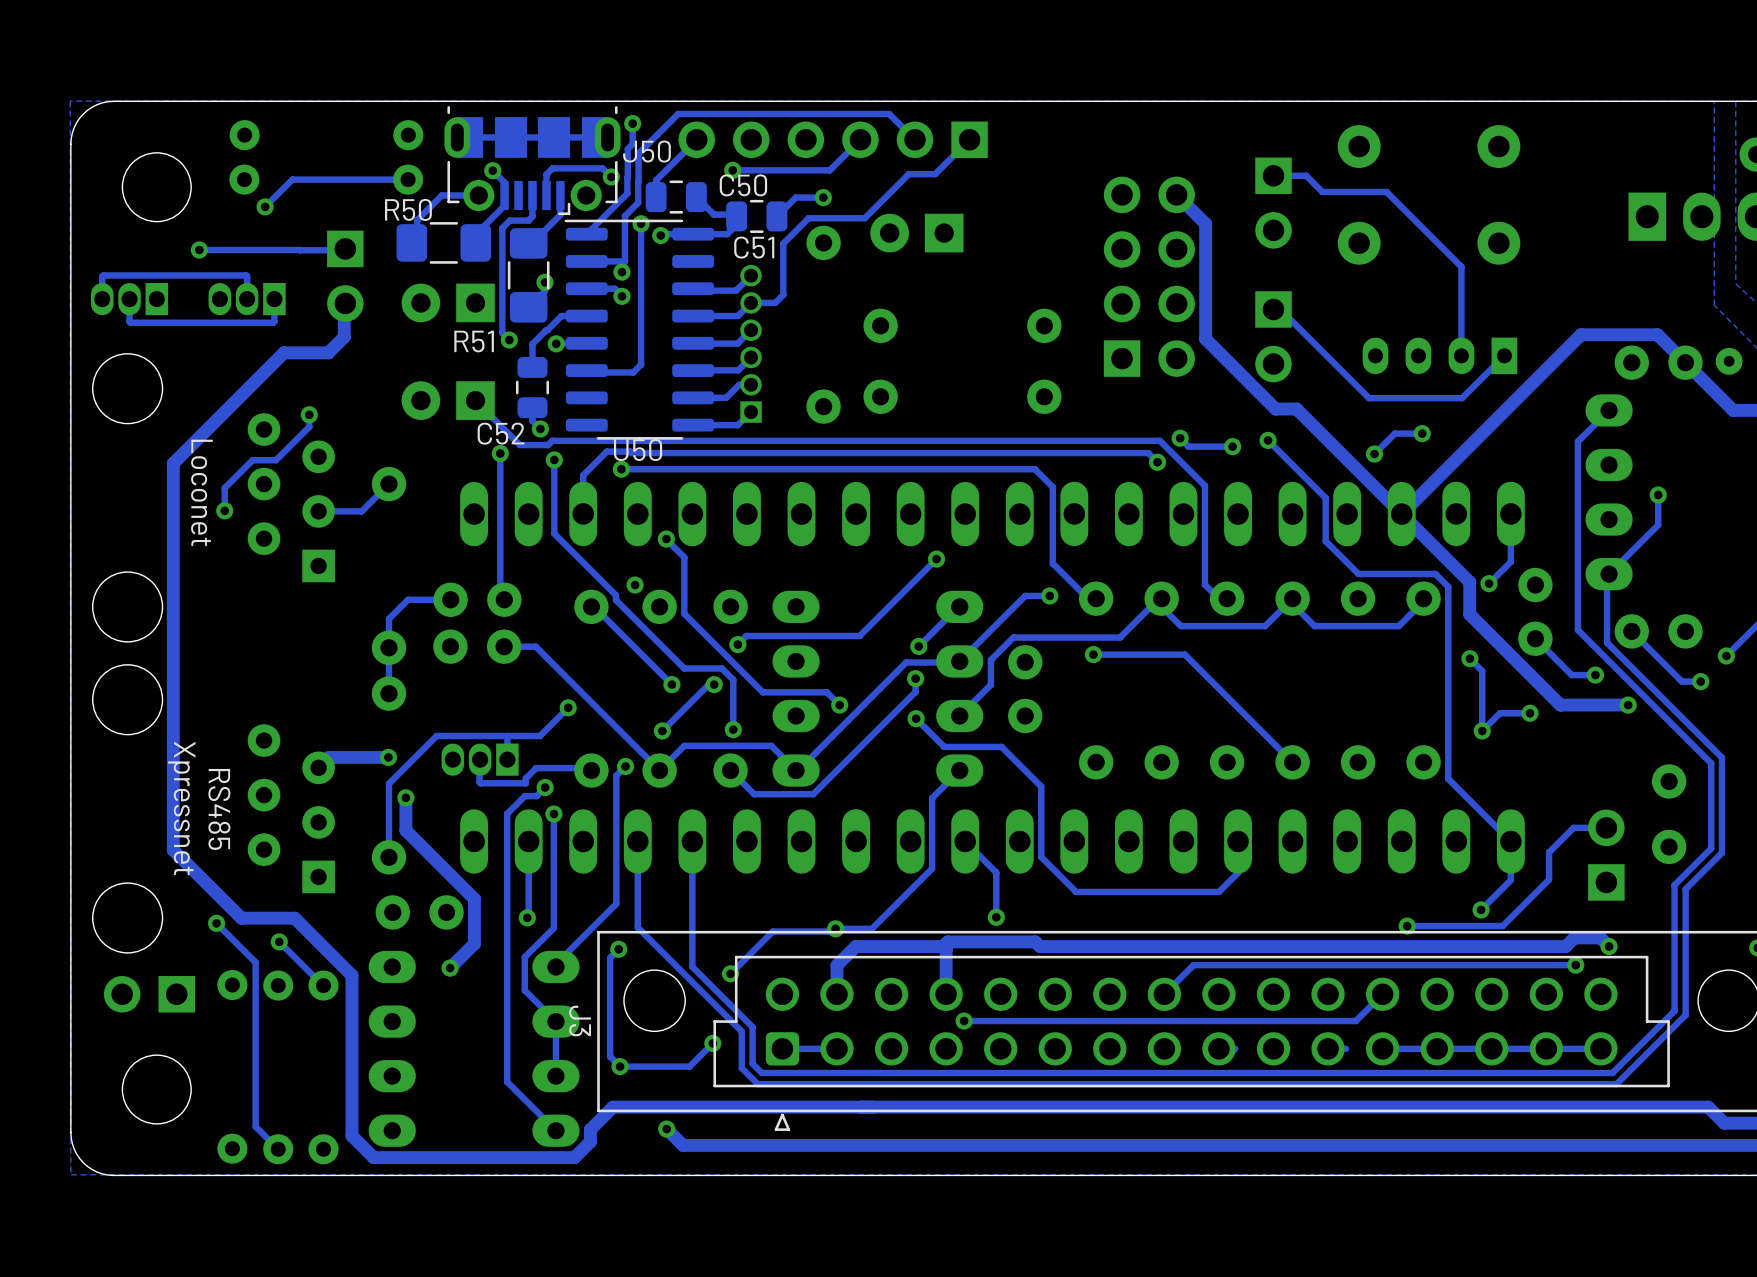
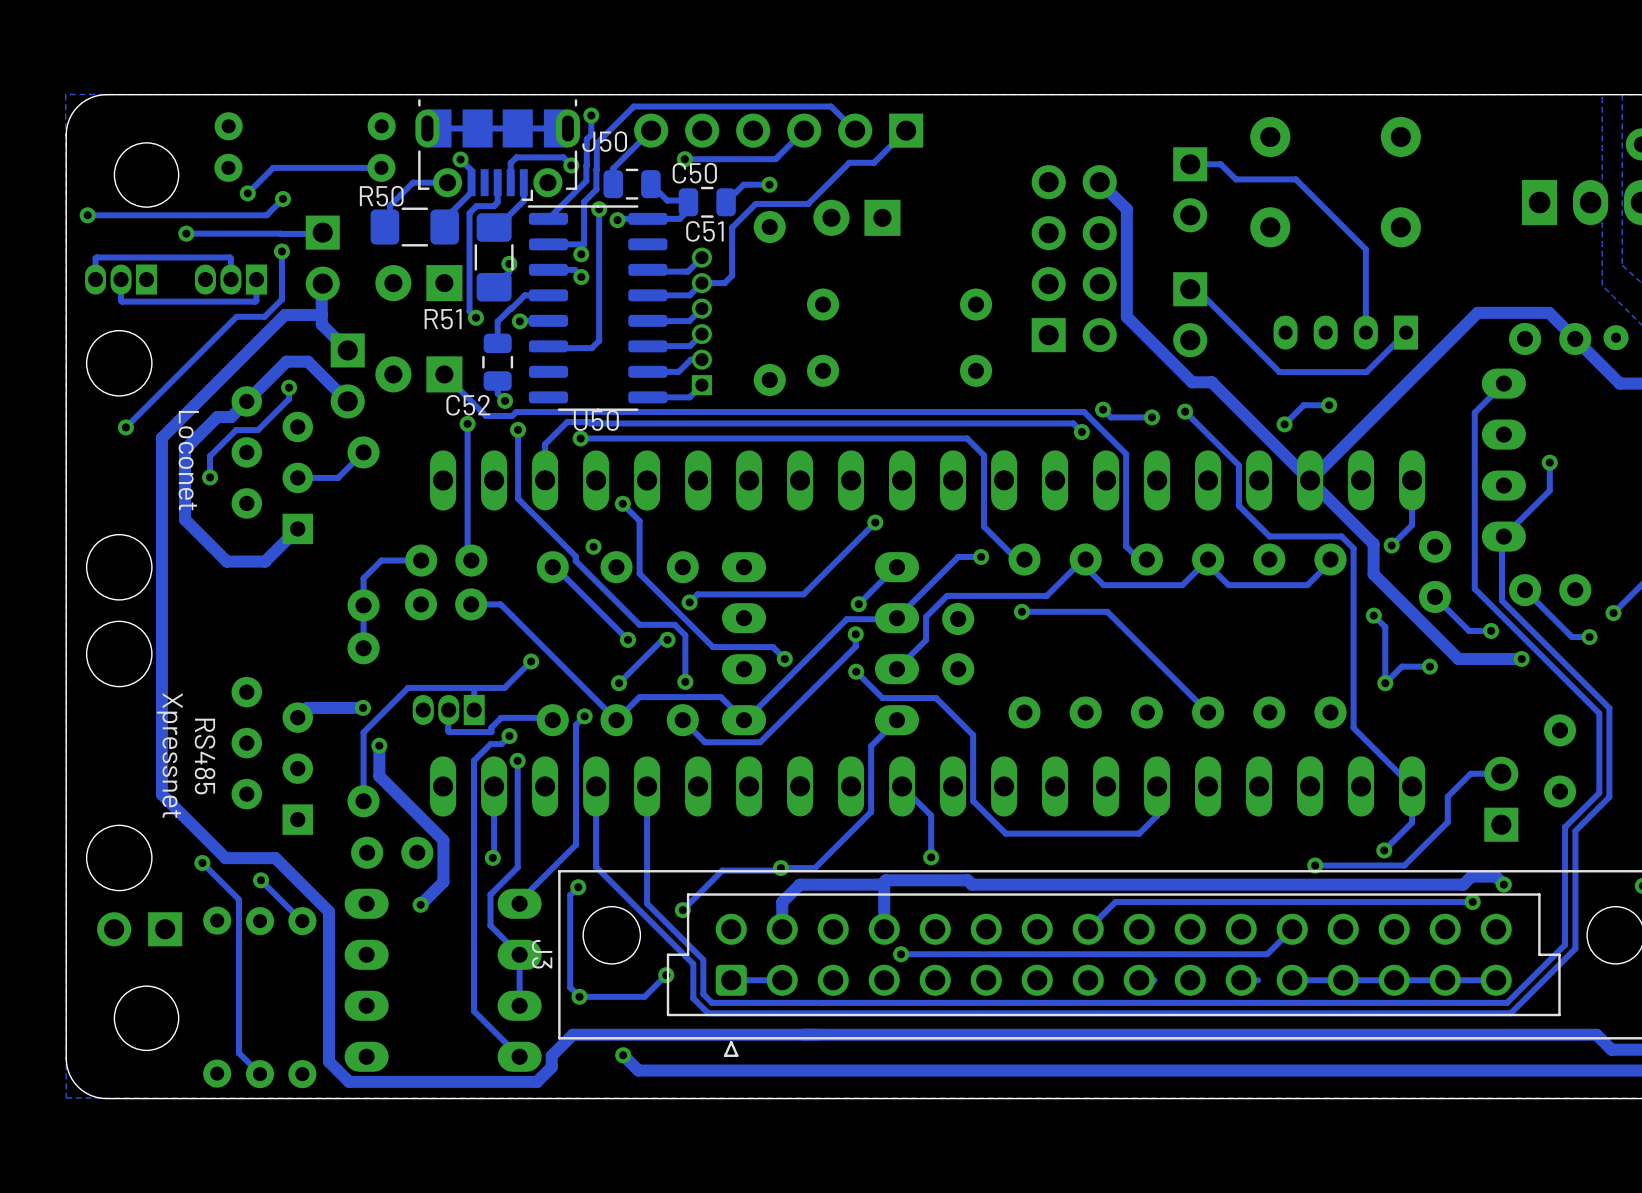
track: none -> (282, 198) (266, 215) (87, 215)
via: none -> (282, 198)
via: none -> (87, 215)
track: none -> (281, 251) (281, 299) (264, 316) (236, 316) (125, 427)
via: none -> (281, 251)
track: (344, 337) (328, 352) (283, 352) (173, 463) (173, 468) -> (347, 350) (321, 324) (321, 314) (284, 314) (161, 437)
part: none -> (347, 375)
track: none -> (347, 401) (307, 361) (286, 361) (231, 417) (217, 417) (185, 449) (185, 519) (226, 561) (265, 561) (297, 528)
via: none -> (125, 427)

